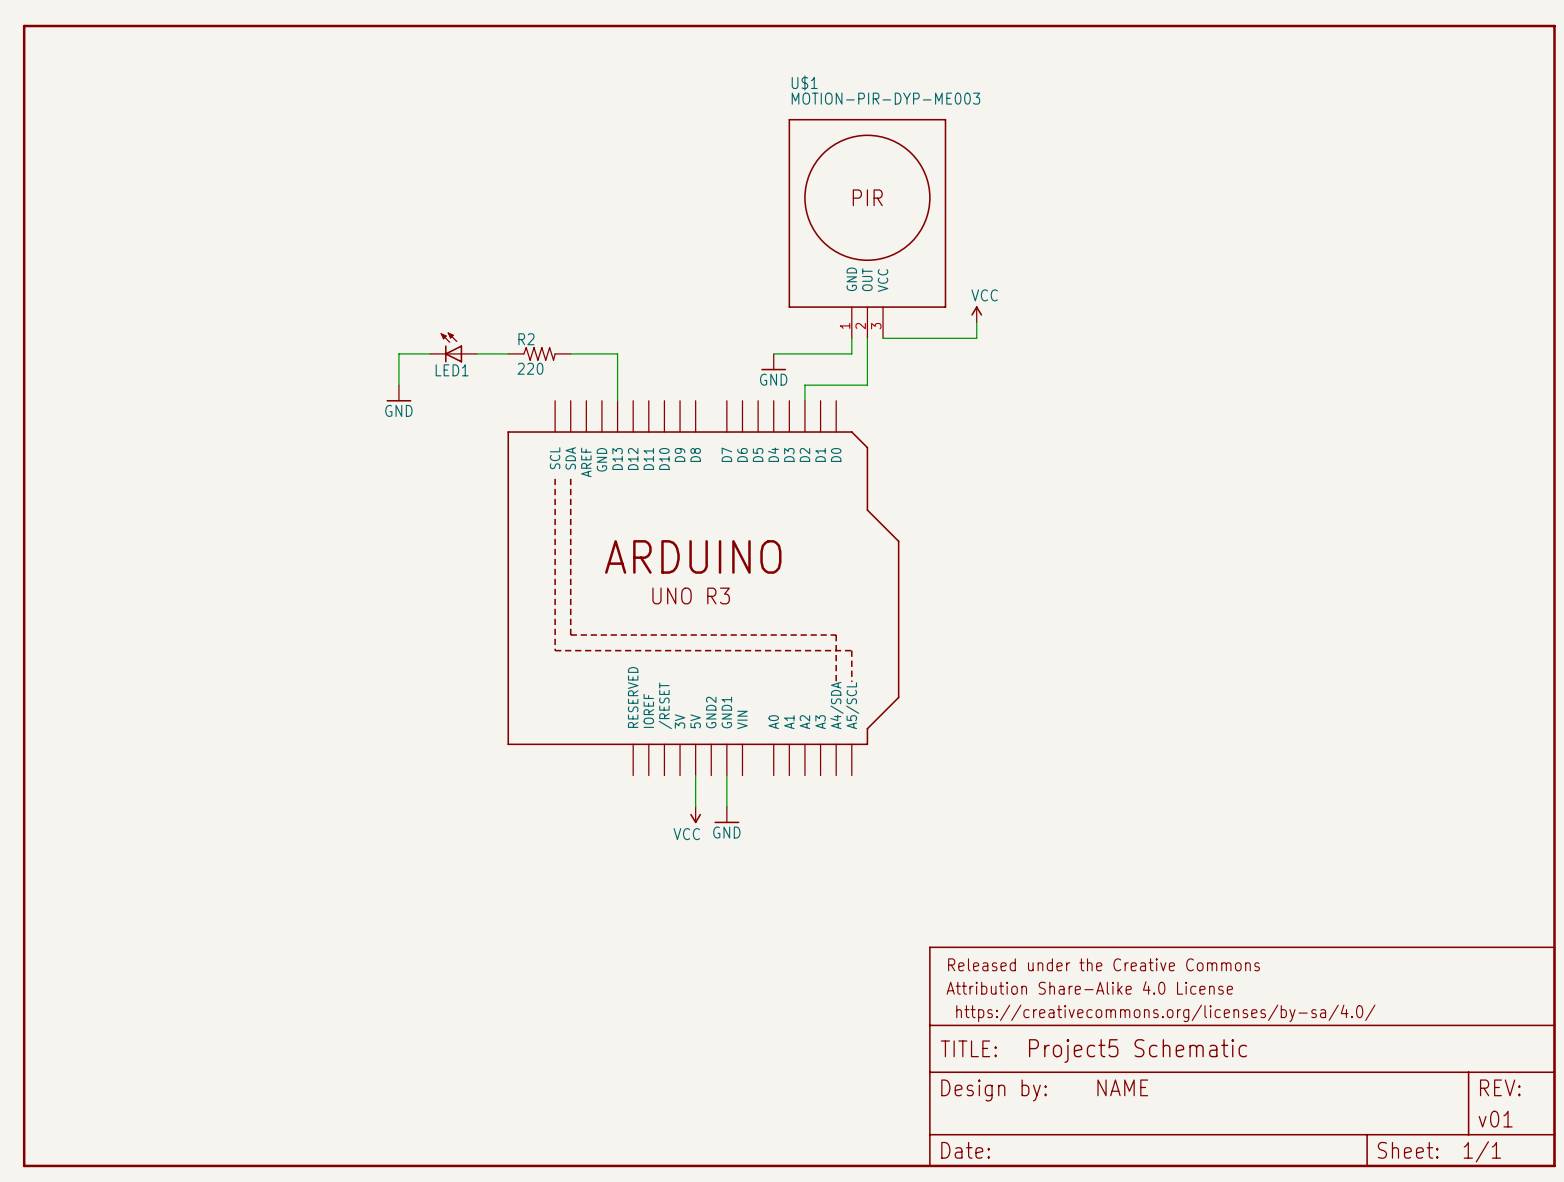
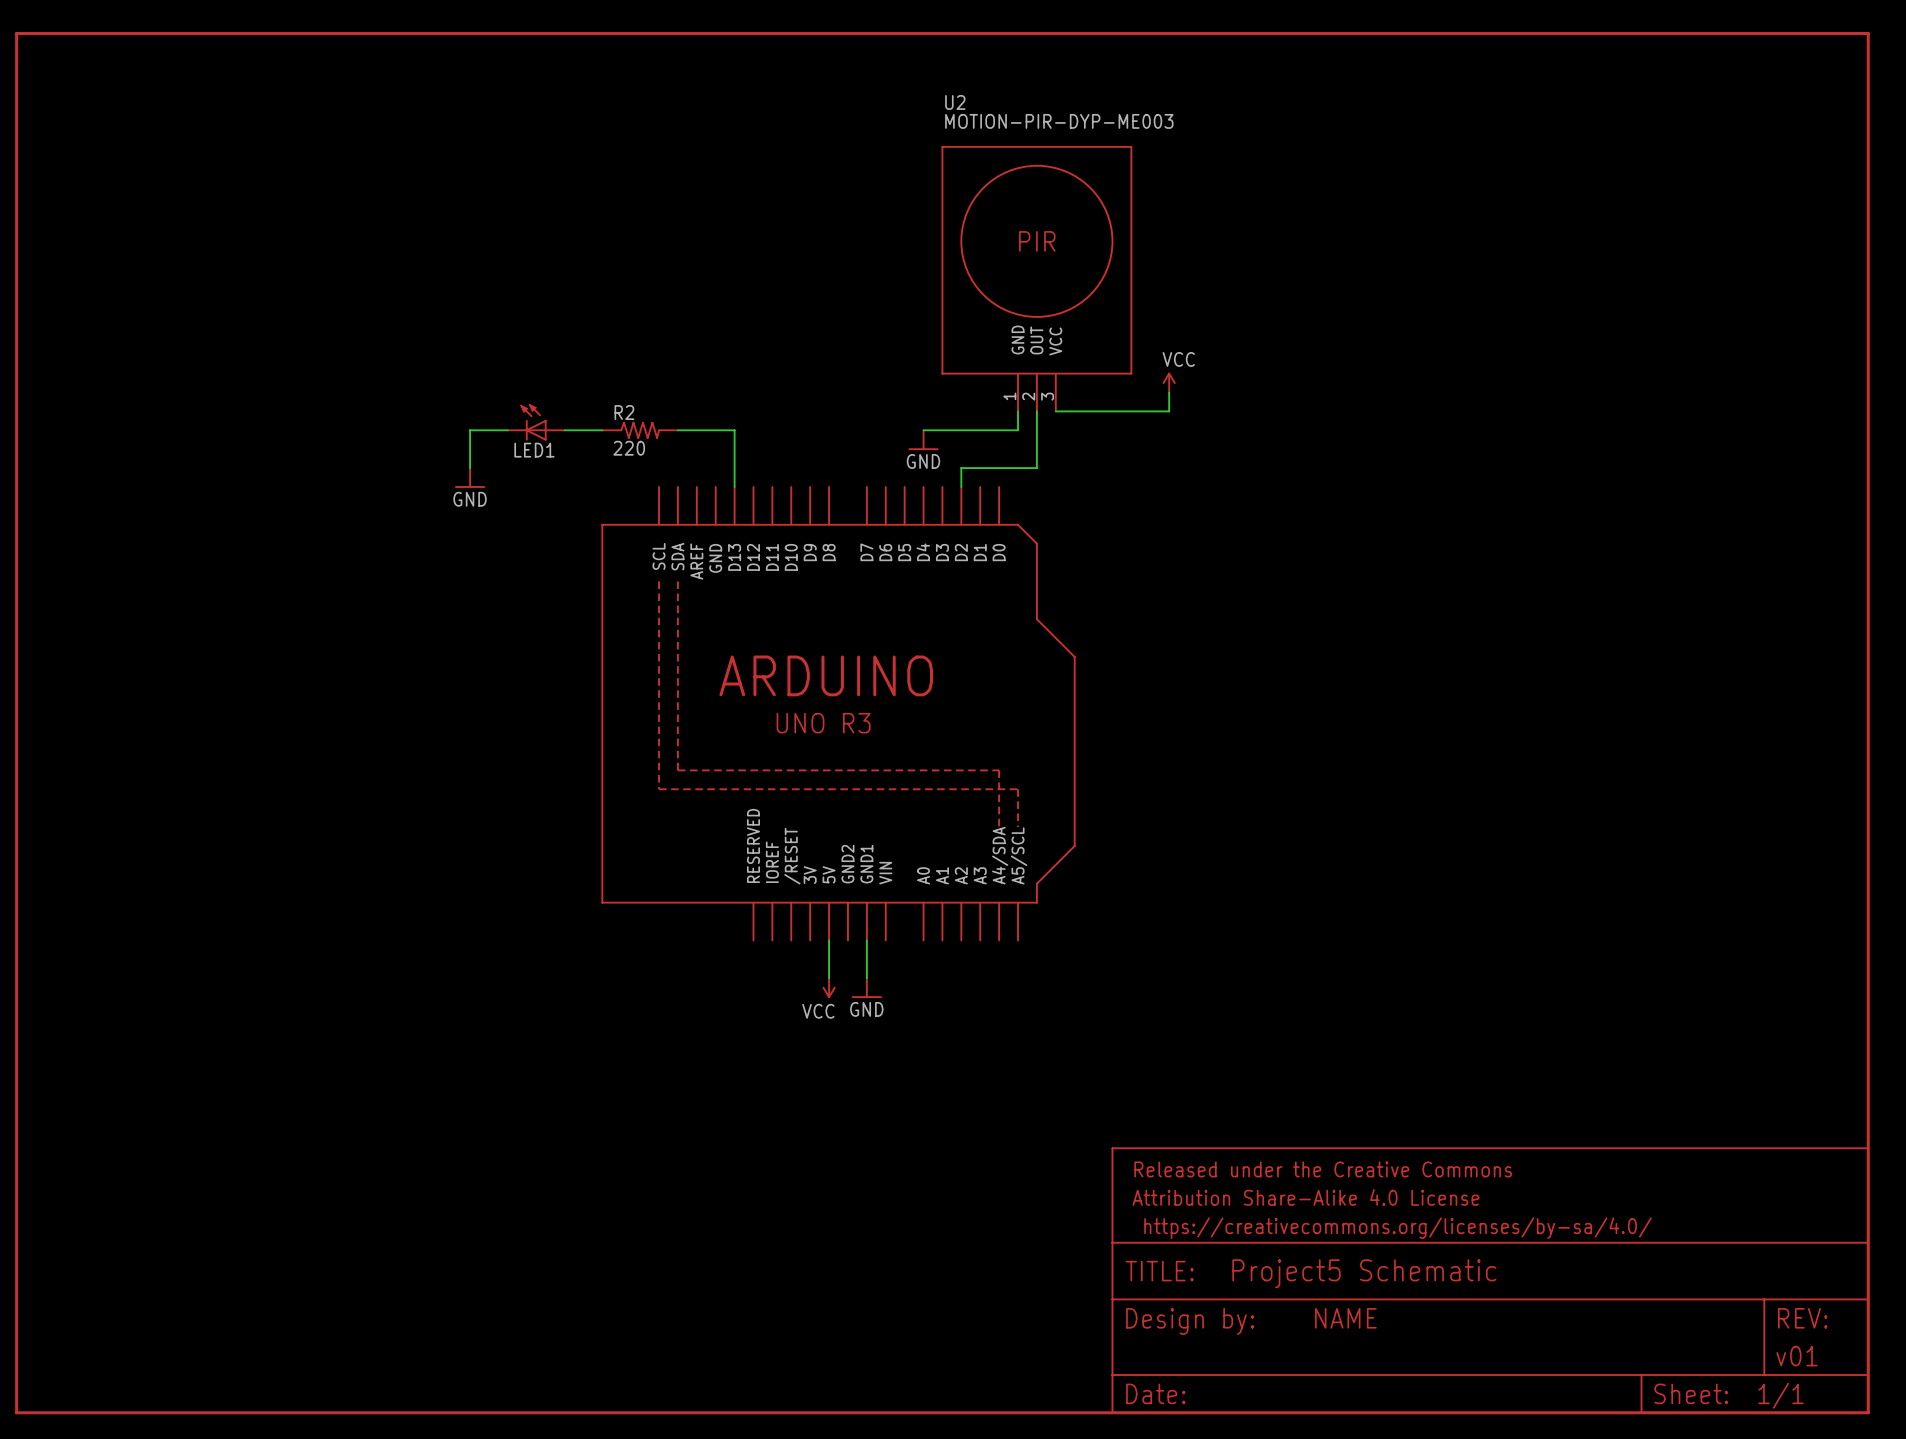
U$1 name: U$1 (804, 83) -> U2 (955, 102)

